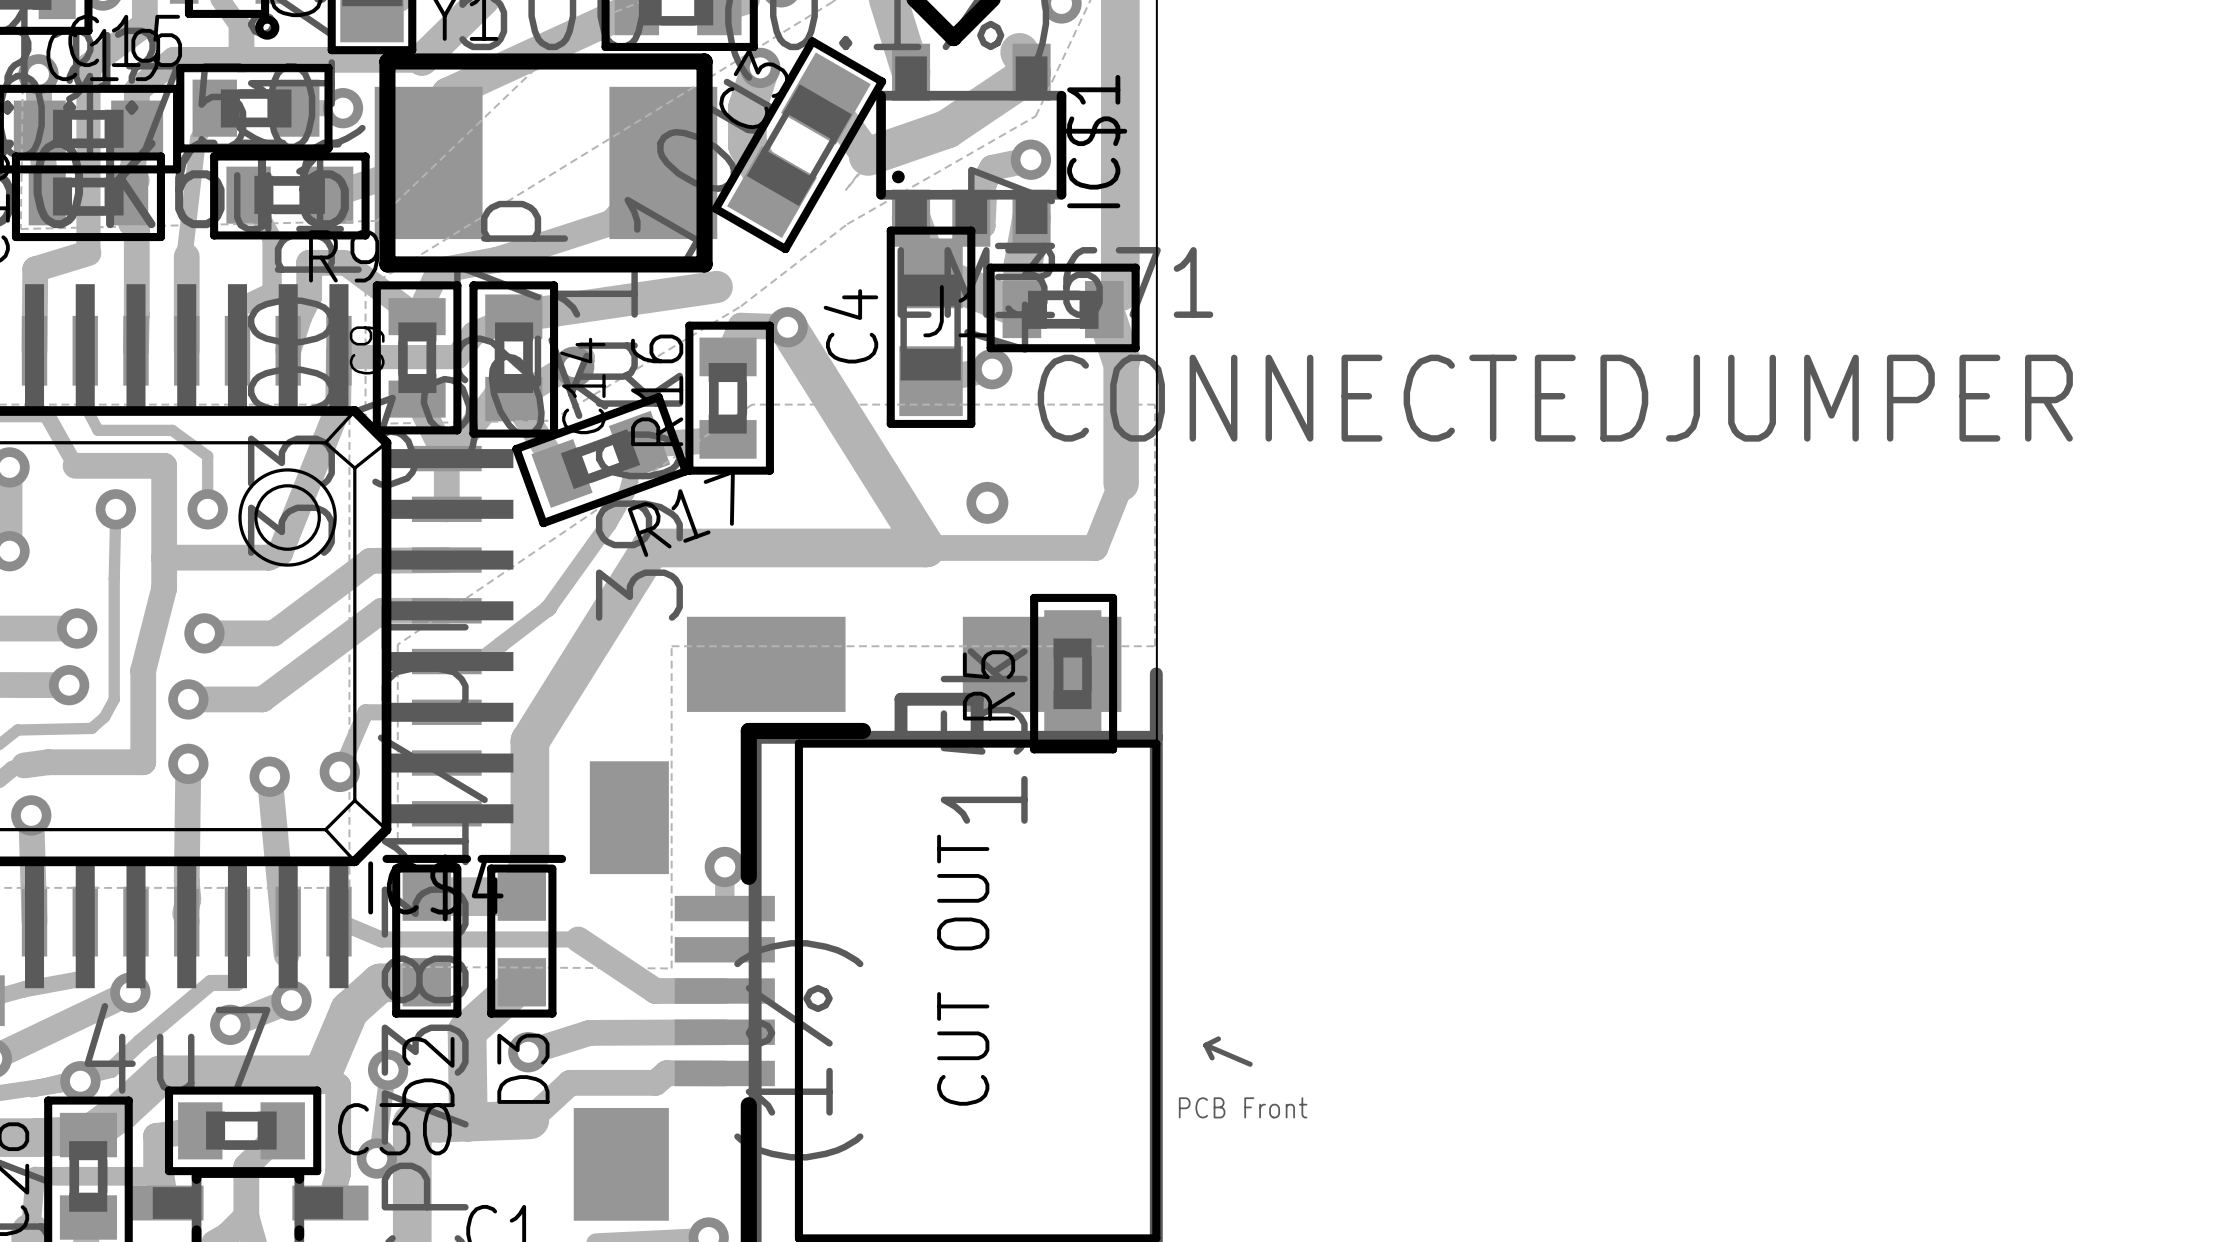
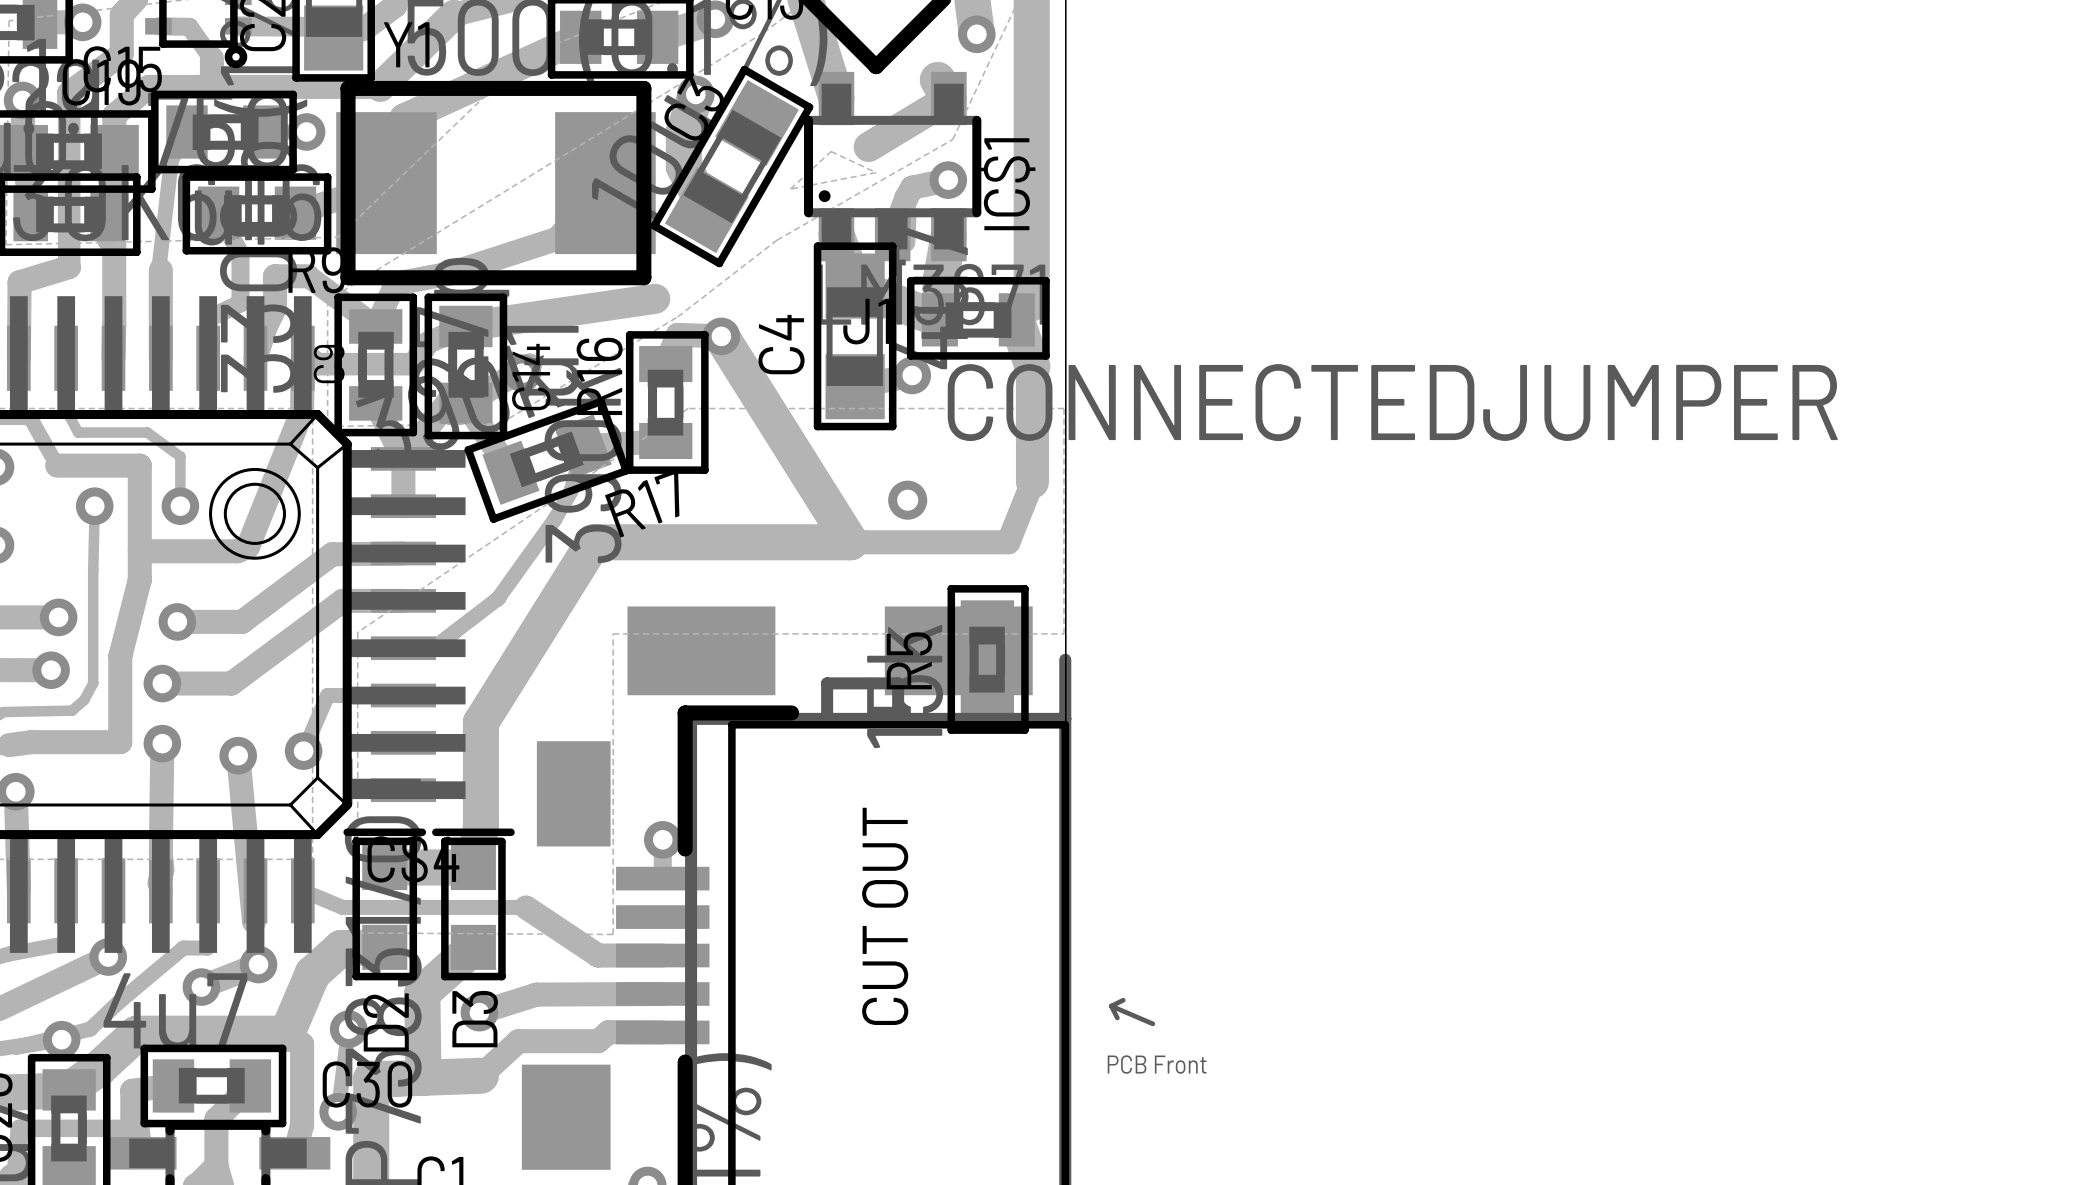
track: (1031, 72) (947, 129) (868, 156) (825, 98) -> (948, 98) (868, 147)
zone outline: none -> (831, 151) (790, 189) (876, 172) (831, 151)
zone outline: (861, 169) (861, 171) (845, 190) (861, 169) -> none

